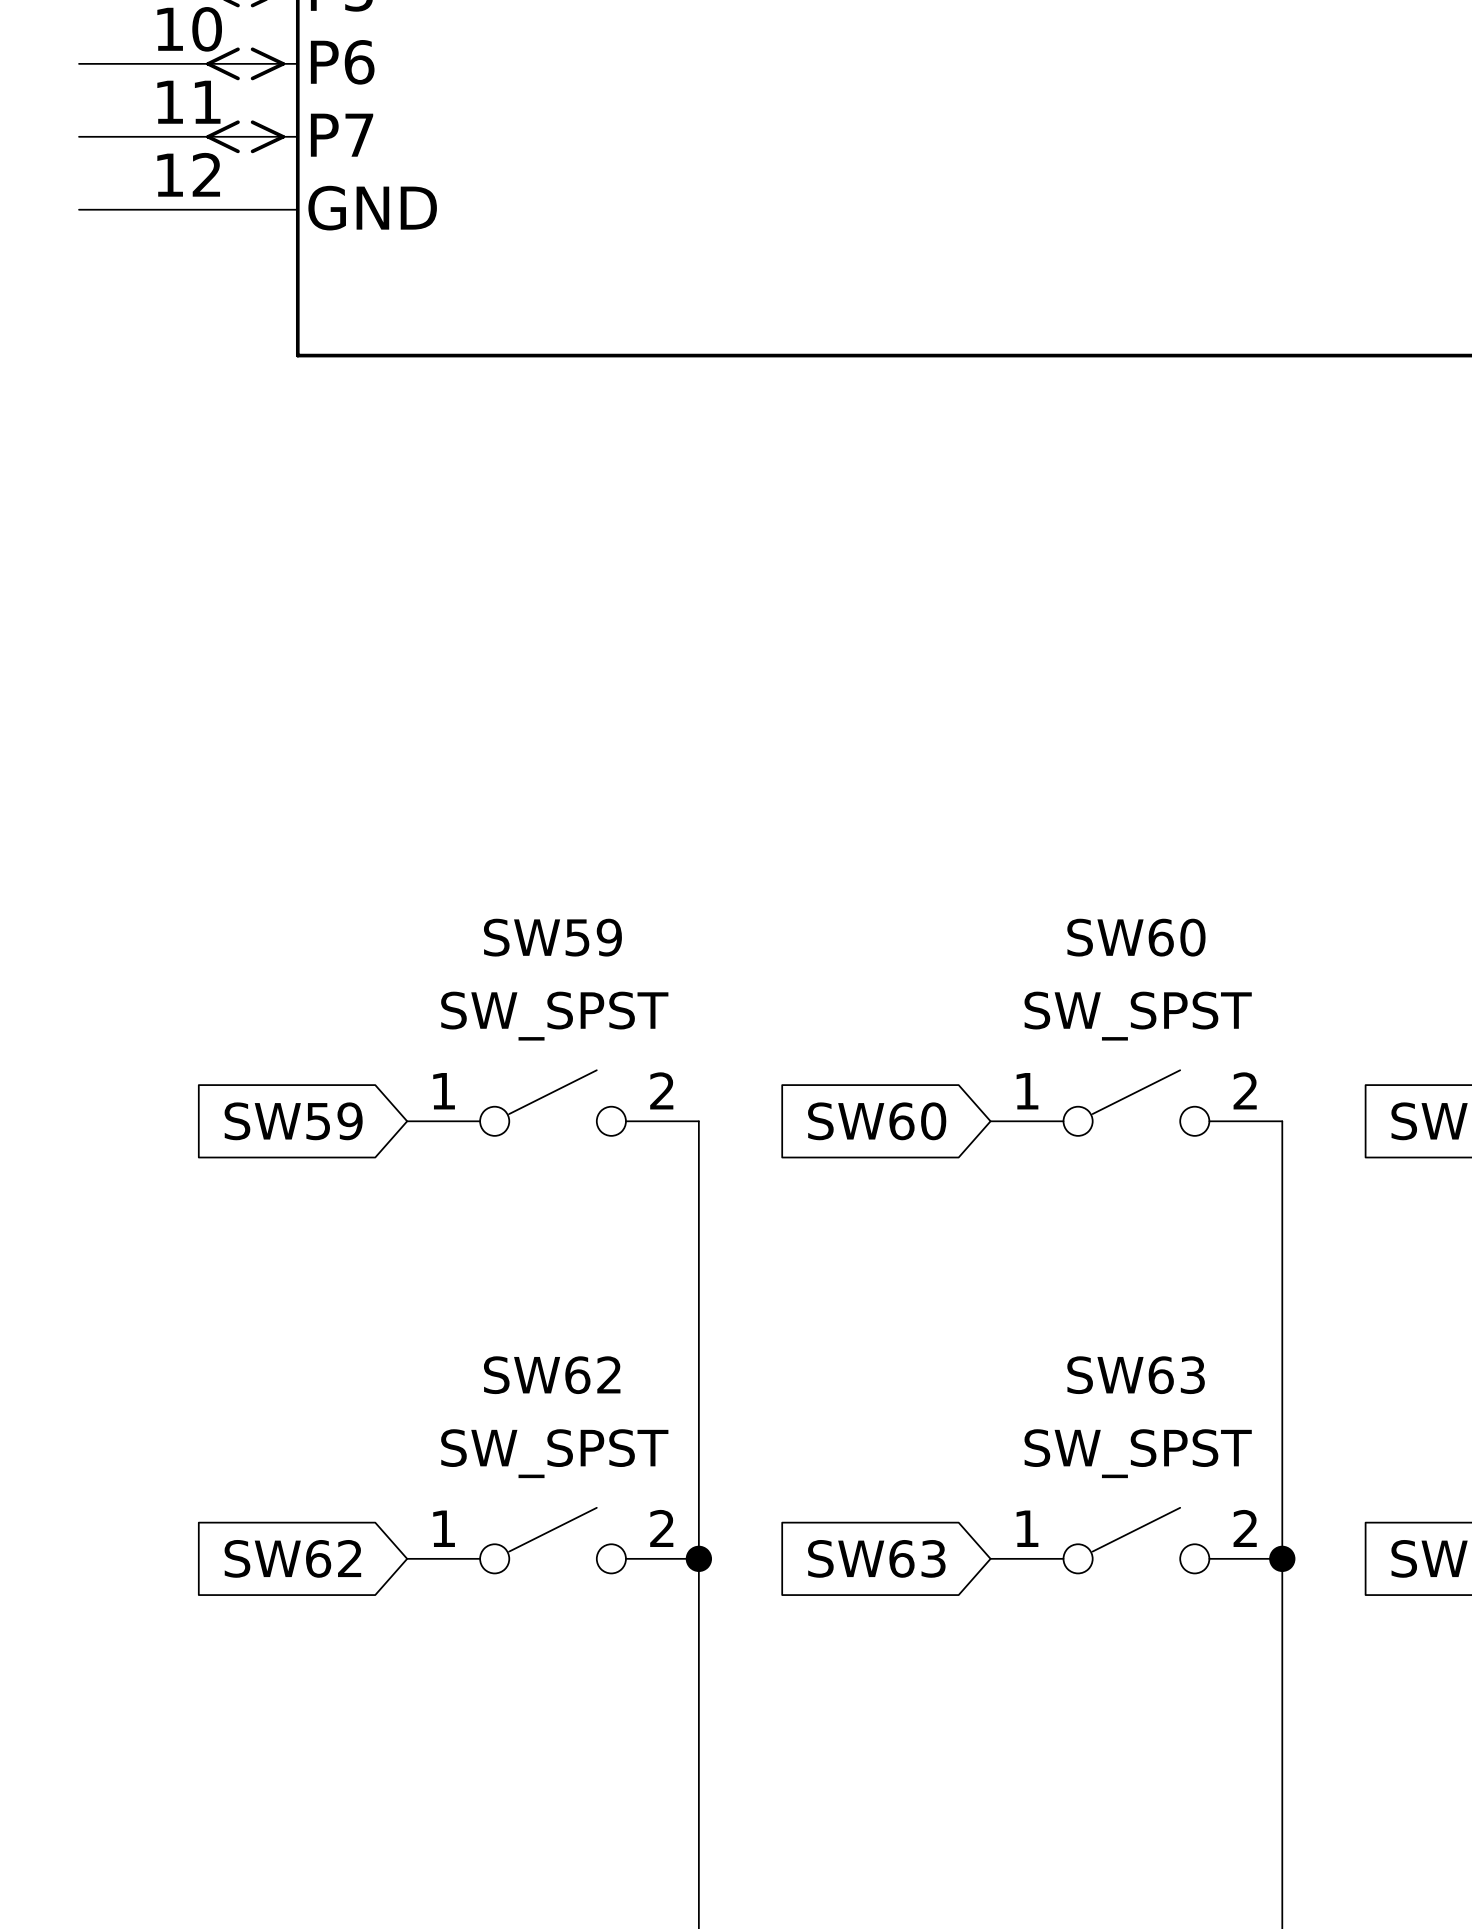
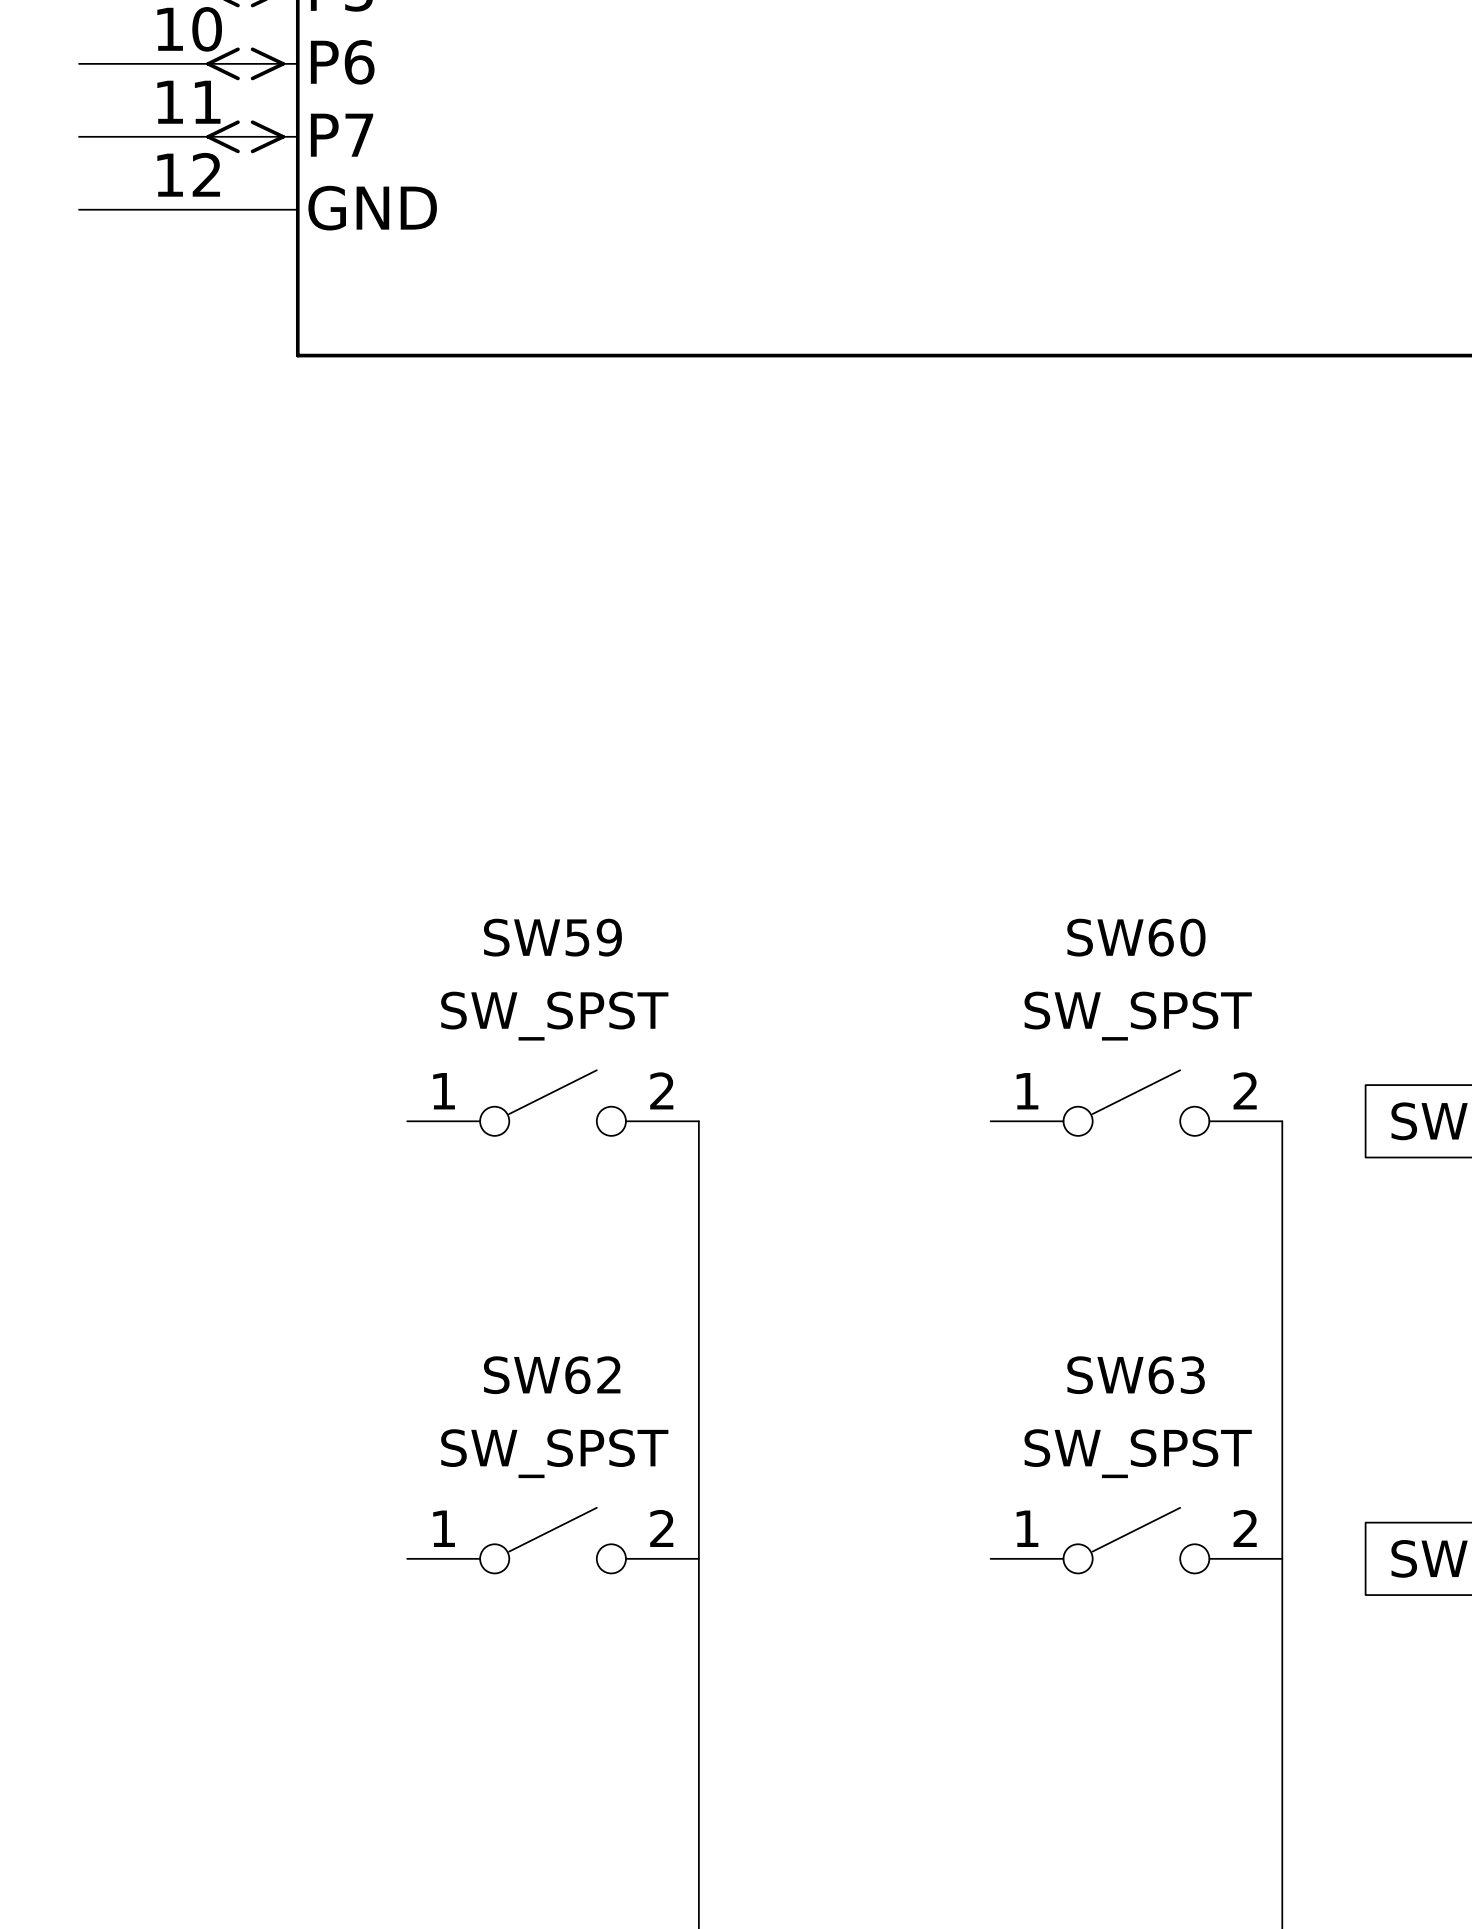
global label: SW59 (293, 1121) -> none
global label: SW60 (877, 1121) -> none
global label: SW62 (292, 1558) -> none
junction: (698, 1558) -> none
global label: SW63 (876, 1558) -> none
junction: (1282, 1558) -> none

